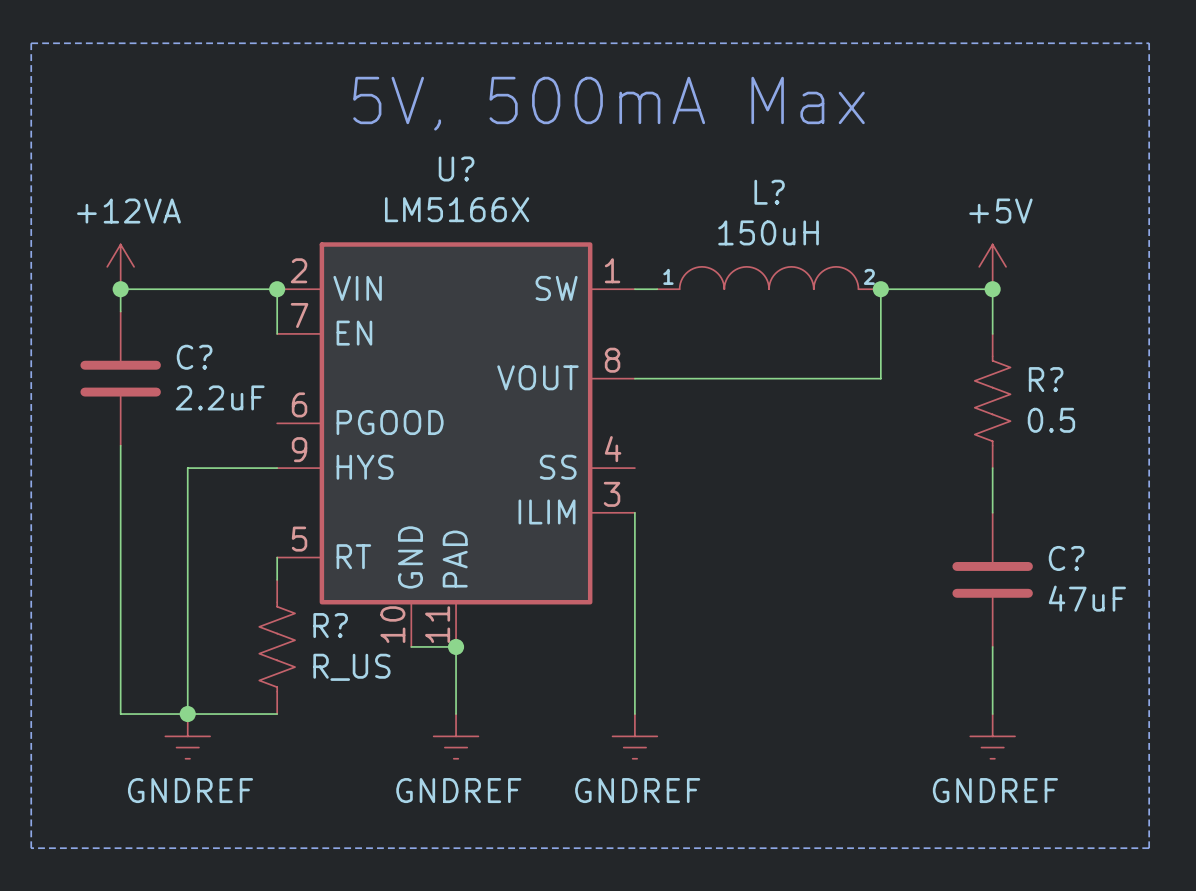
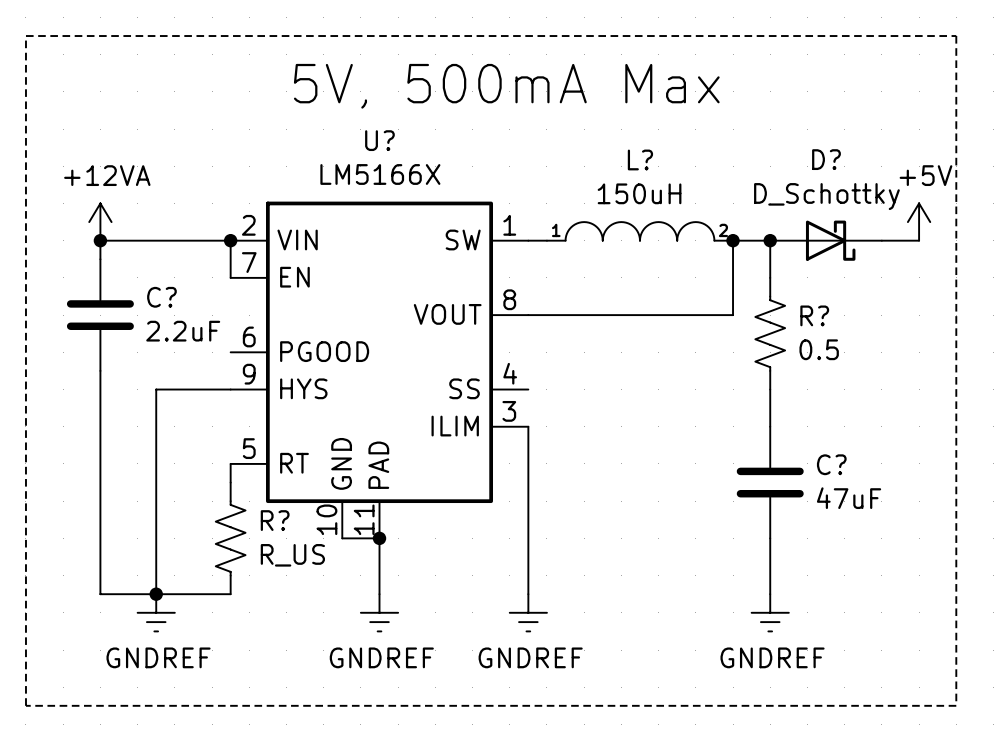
power symbol position: +5V (992, 266) -> +5V (919, 222)
wire: (925, 289) (992, 289) (992, 333) -> (770, 240) (770, 277)
D?: none -> D_Schottky (826, 240)
junction position: (992, 289) -> (770, 240)
wire: none -> (881, 240) (919, 240)
R? position: (992, 401) -> (770, 333)
wire: (992, 468) (992, 512) -> (770, 389) (770, 426)
C? position: (992, 579) -> (770, 482)
wire: (992, 646) (992, 714) -> (770, 538) (770, 594)
power symbol position: GNDREF (992, 736) -> GNDREF (770, 612)

